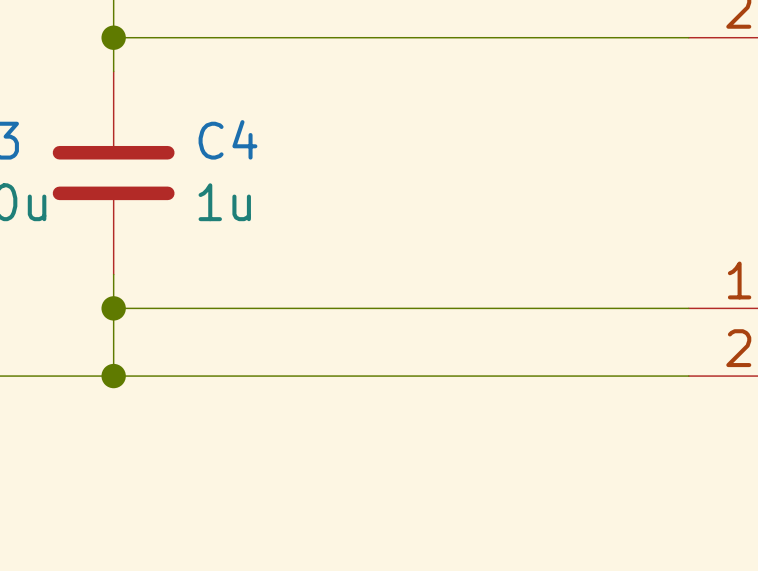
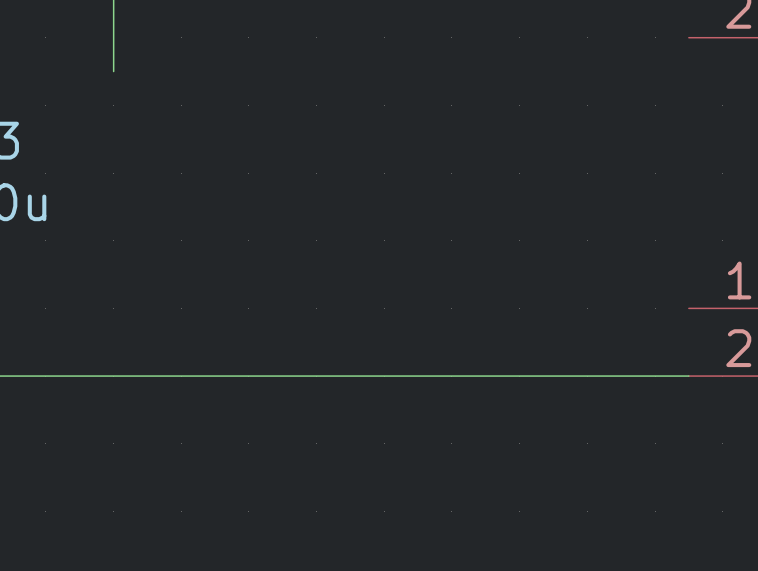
wire: (113, 37) (688, 37) -> none
junction: (113, 37) -> none
C4: 1u (113, 173) -> none
wire: (113, 274) (113, 376) -> none
wire: (113, 308) (688, 308) -> none
junction: (113, 308) -> none
junction: (113, 376) -> none

